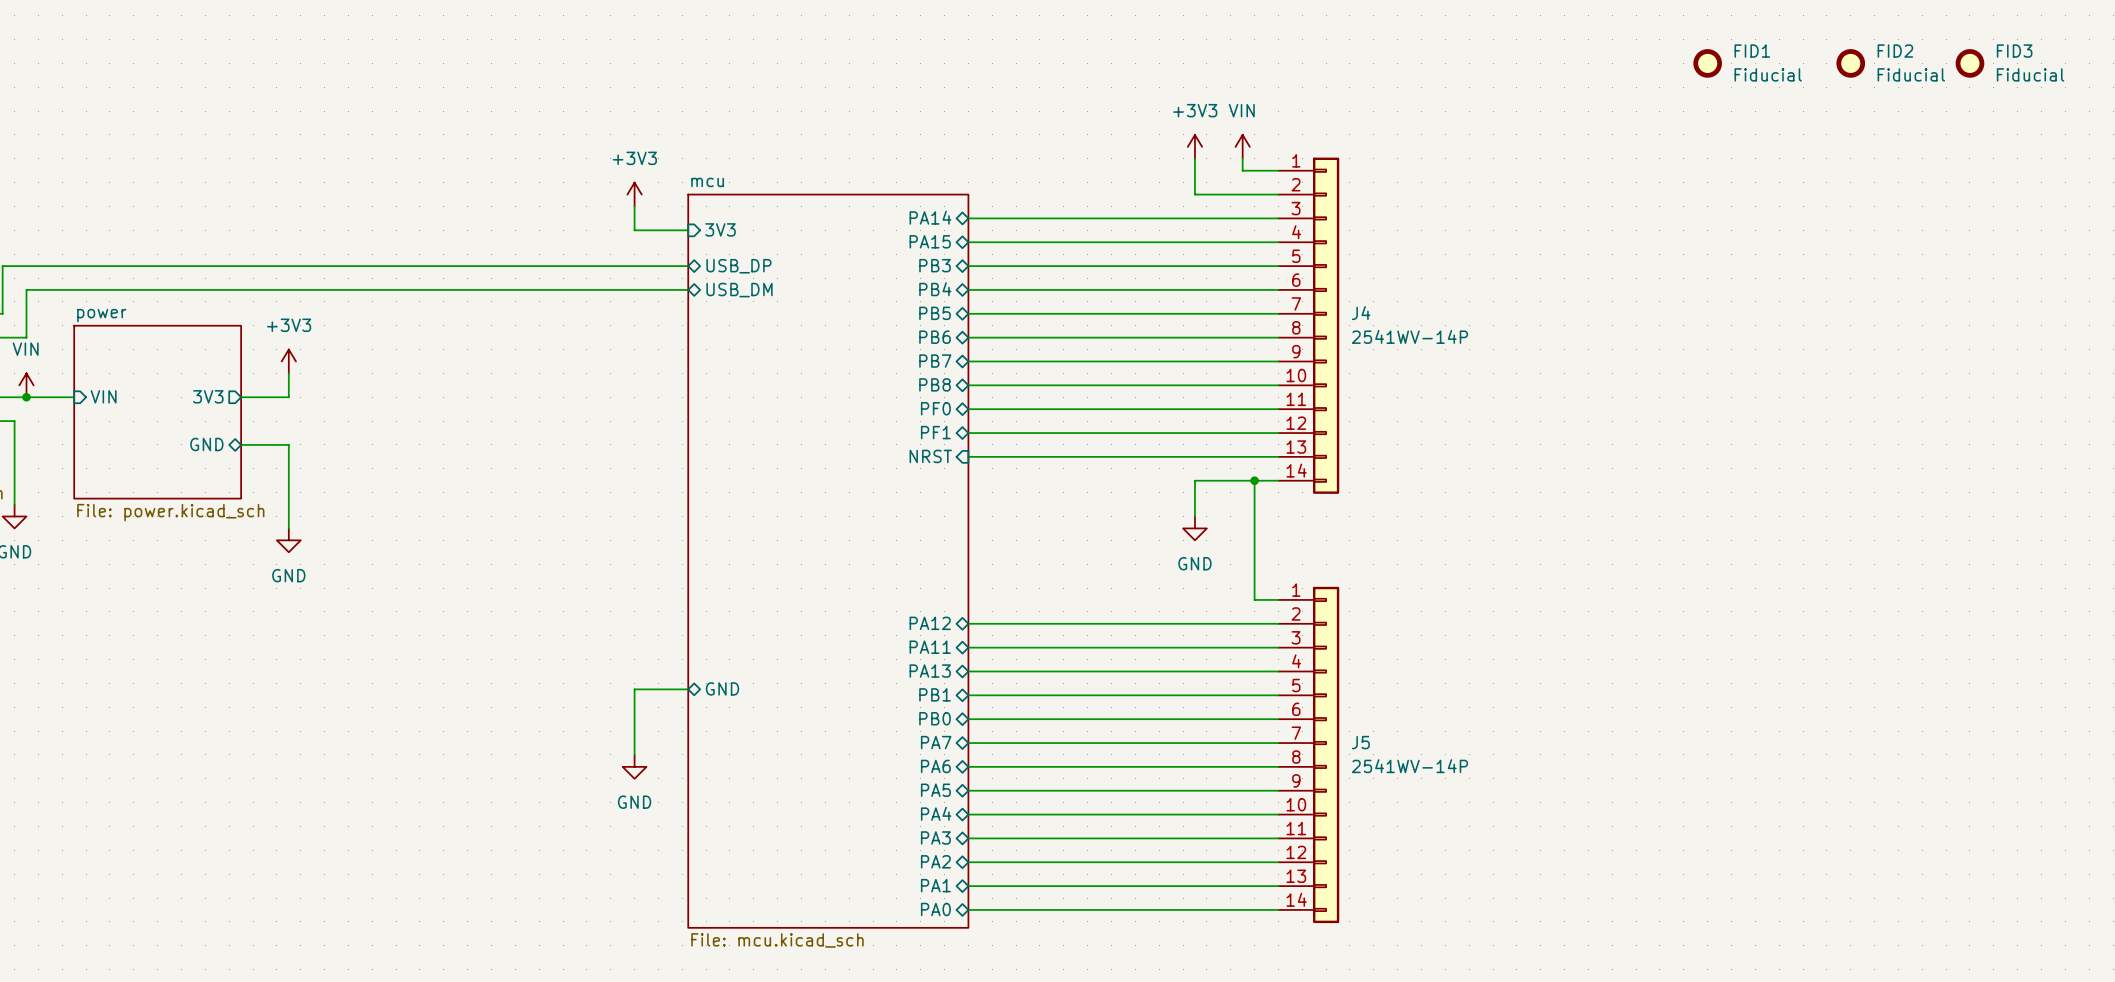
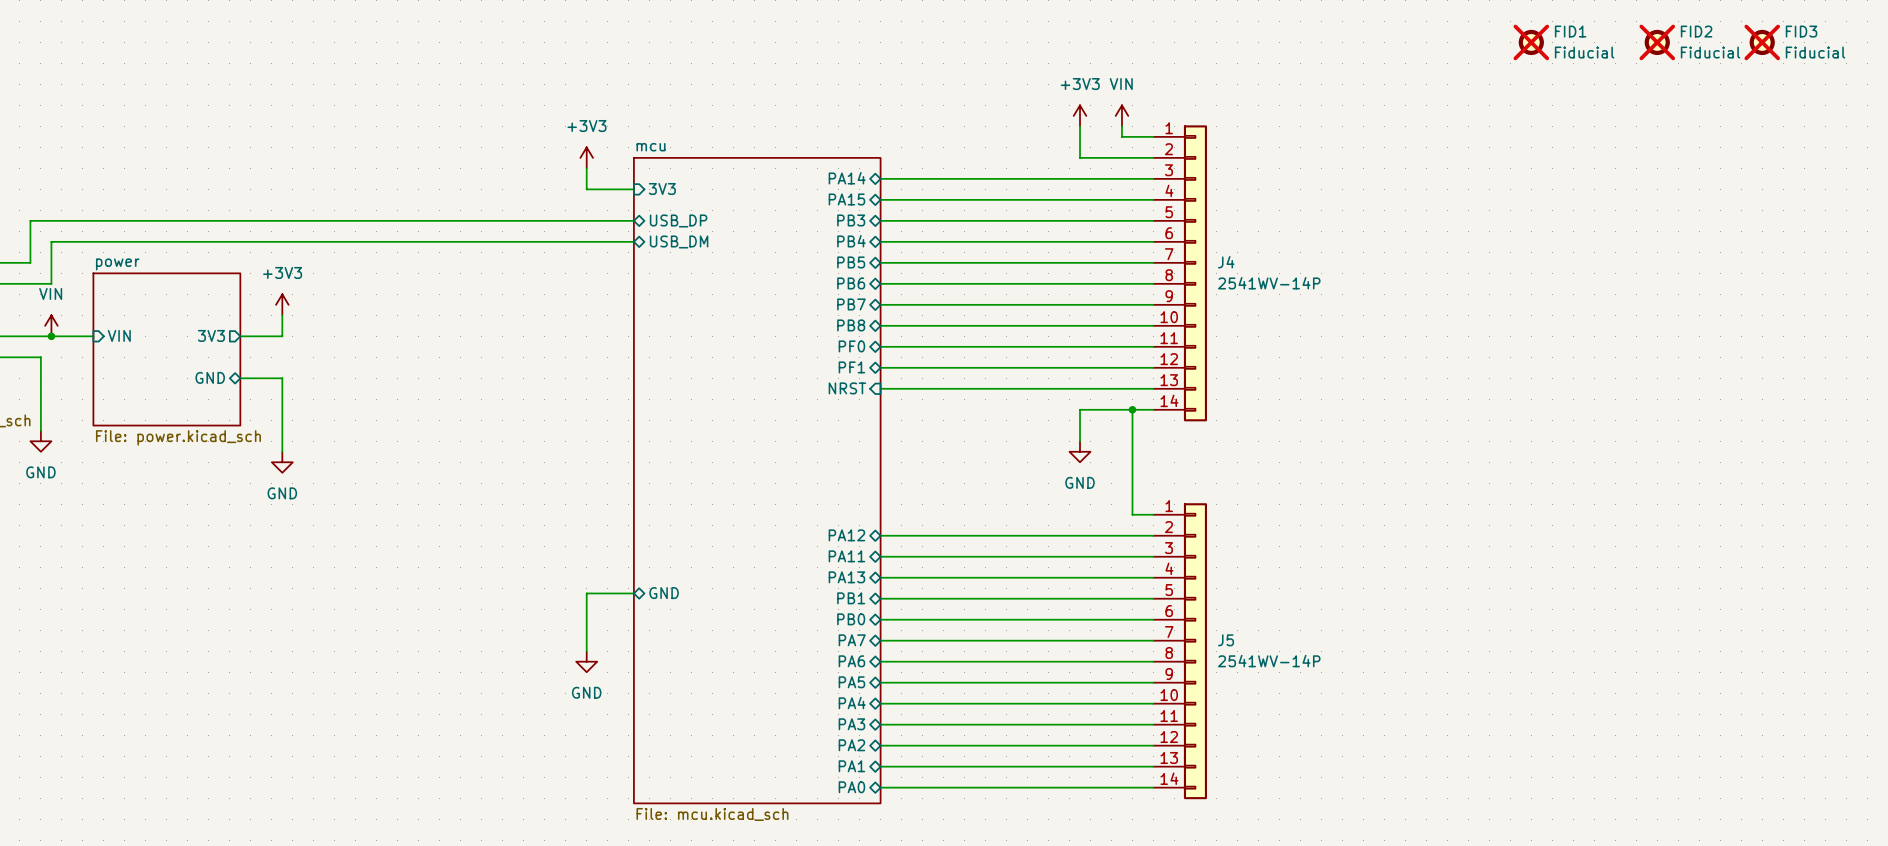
FID1 do-not-place cross: none -> (1531, 42)
FID2 do-not-place cross: none -> (1657, 42)
FID3 do-not-place cross: none -> (1762, 42)

